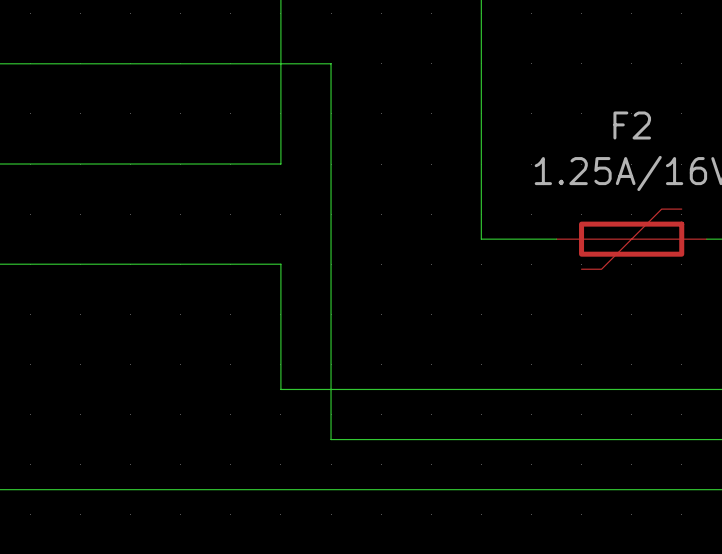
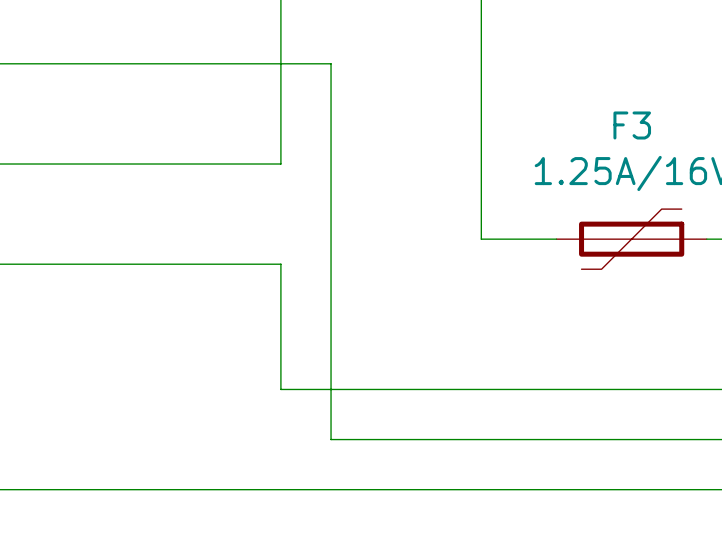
F2 name: F2 (632, 125) -> F3 (632, 125)

